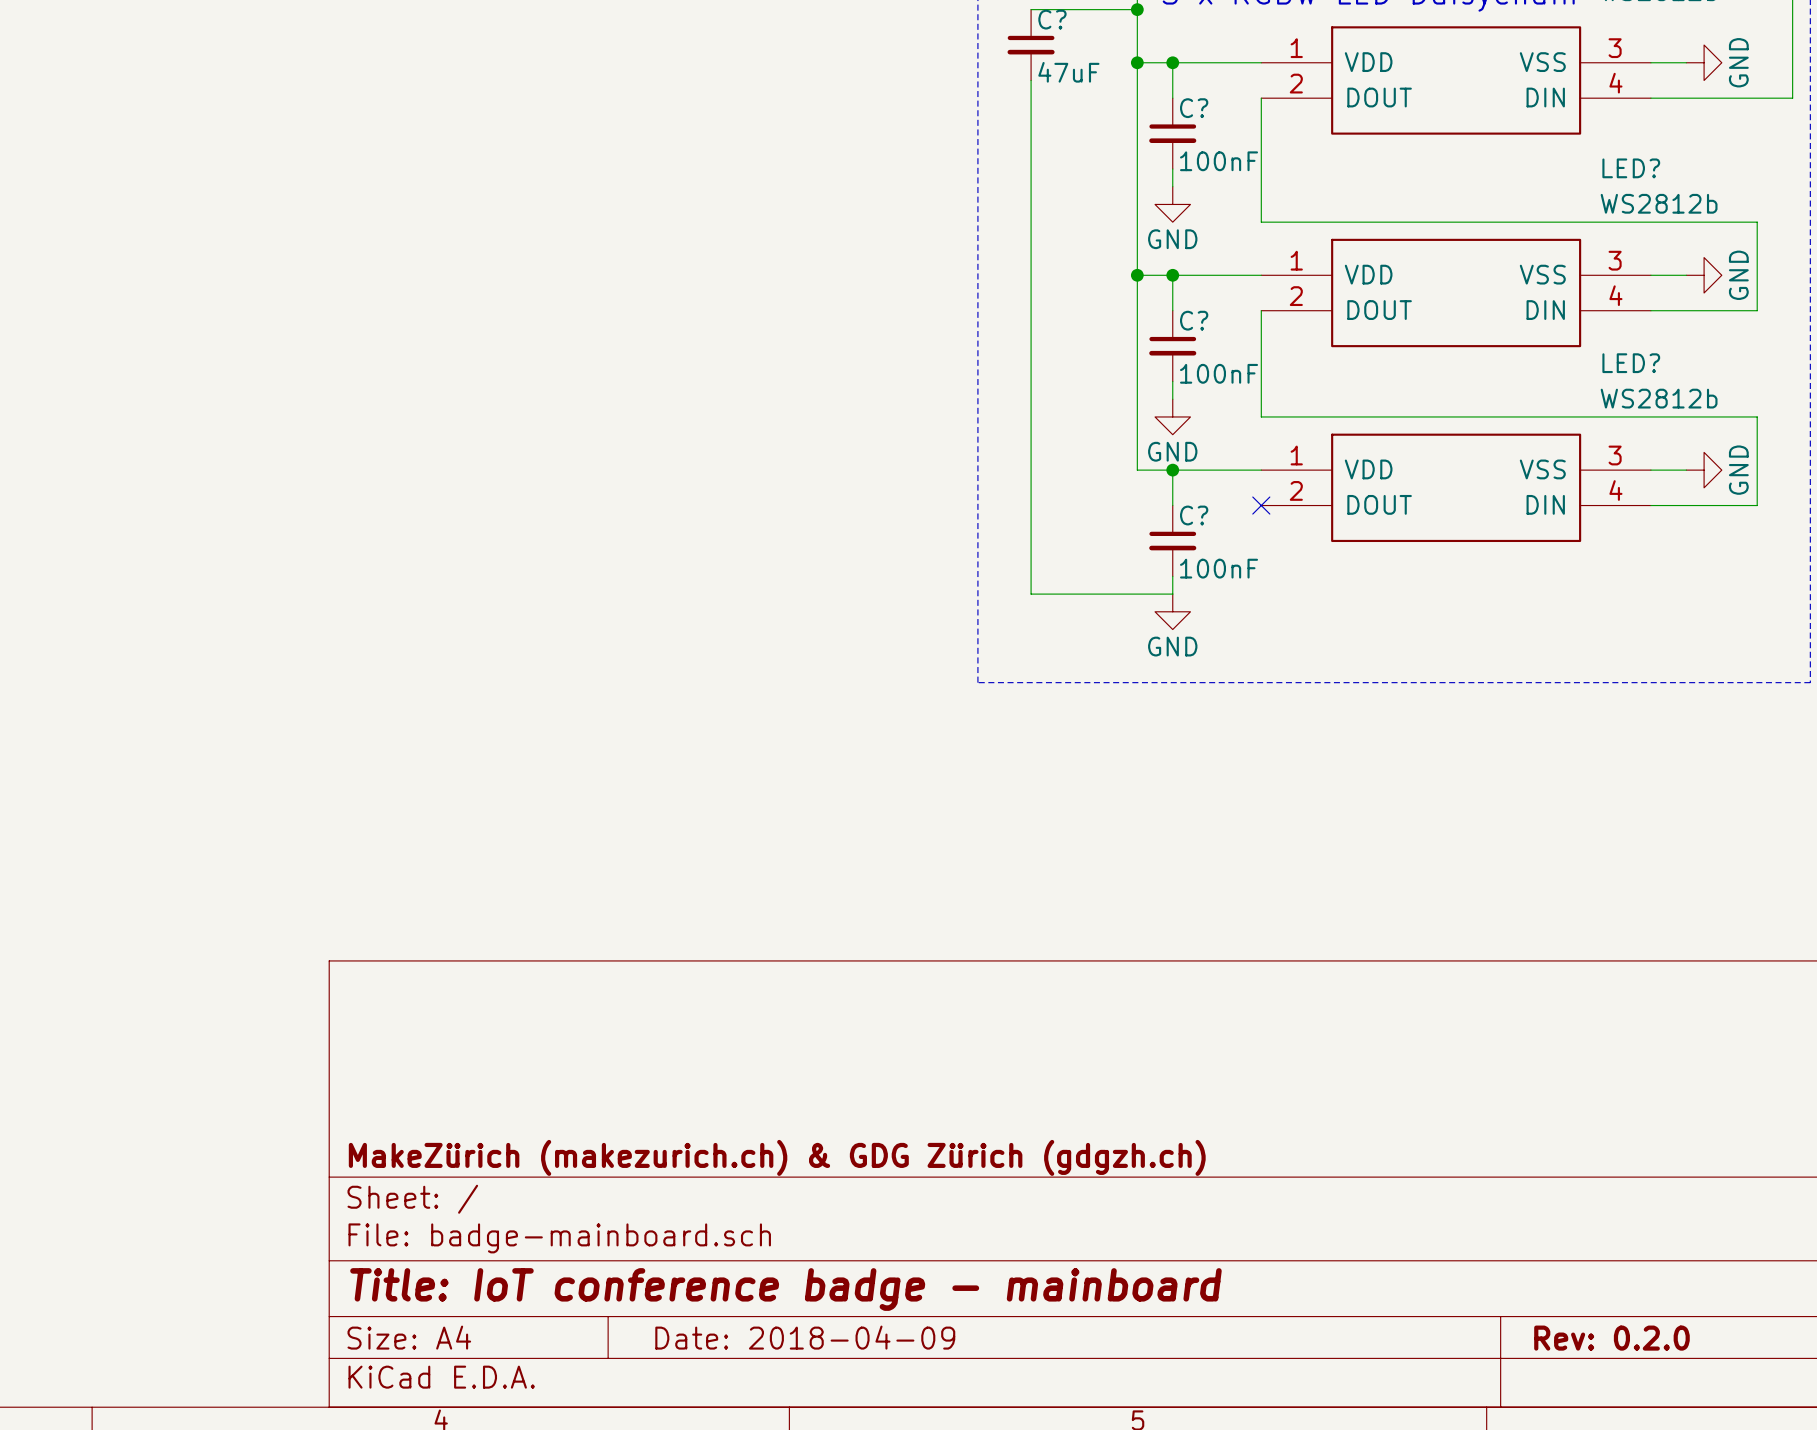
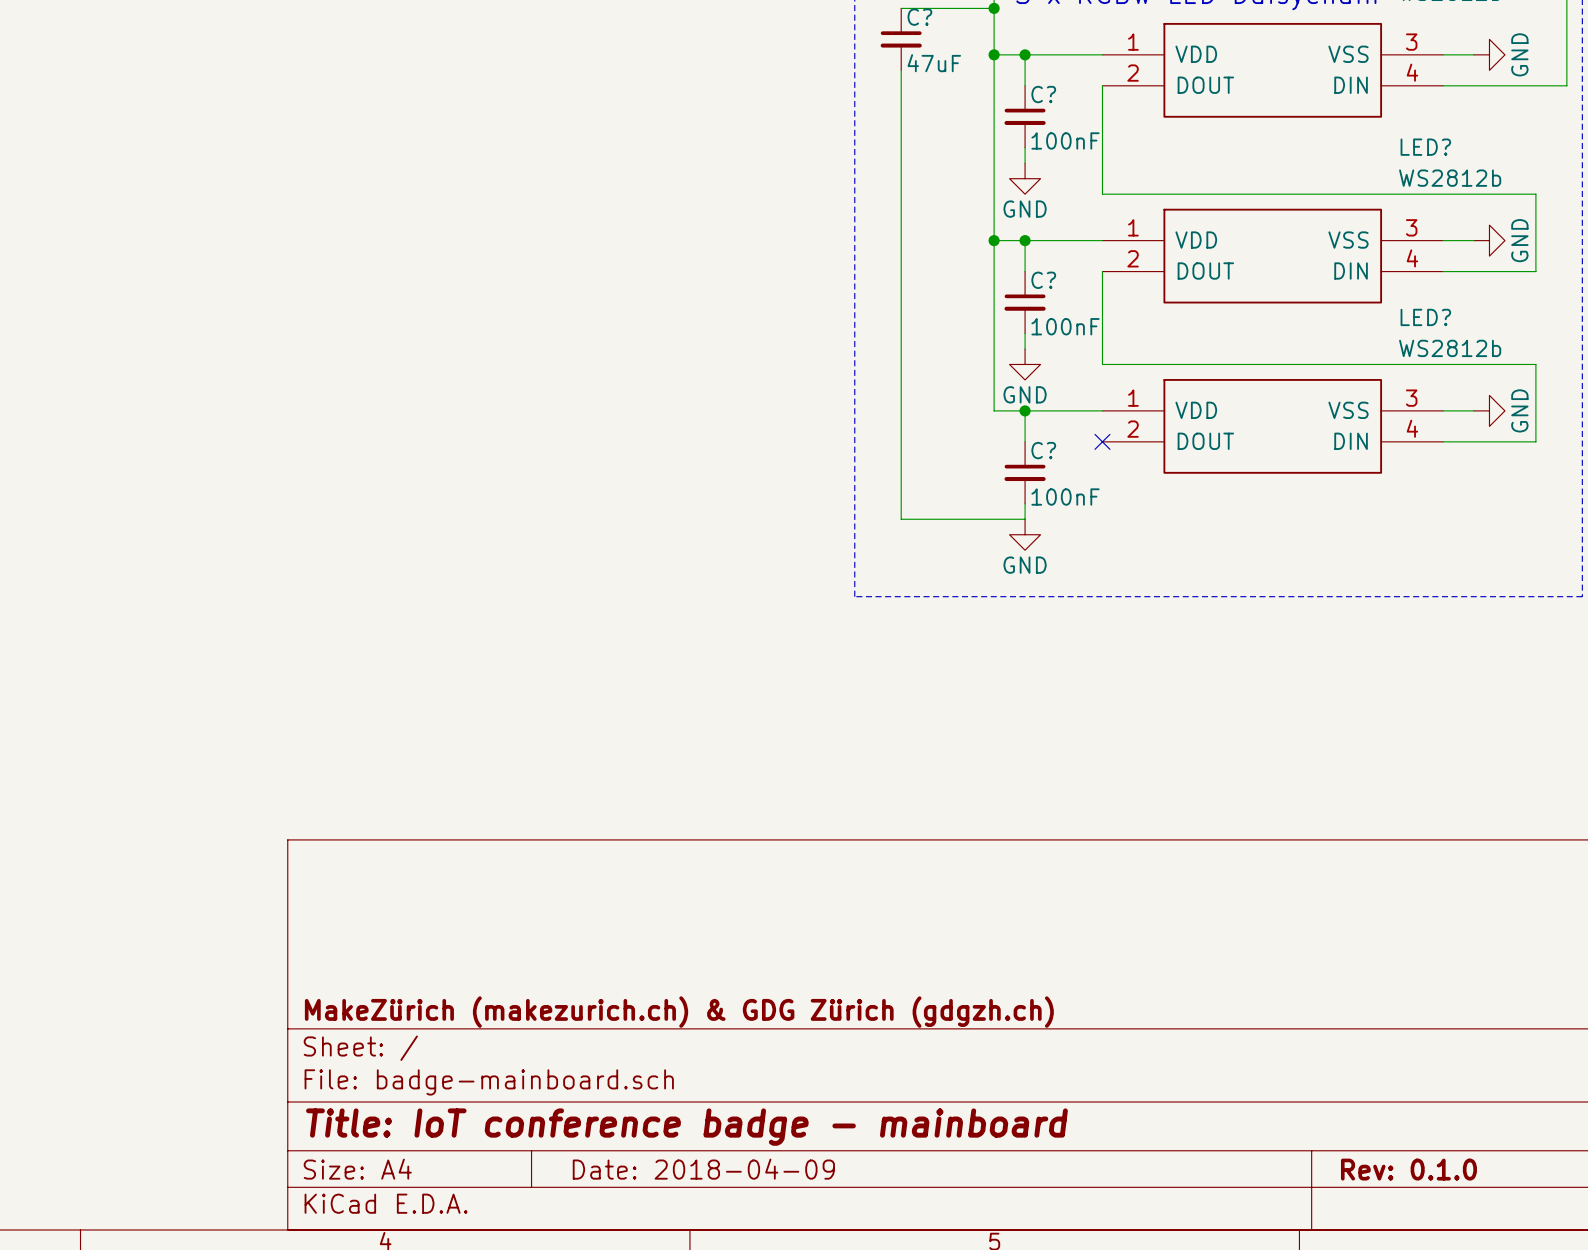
title block: Rev: 0.2.0 (1611, 1338) -> Rev: 0.1.0 (1408, 1169)

